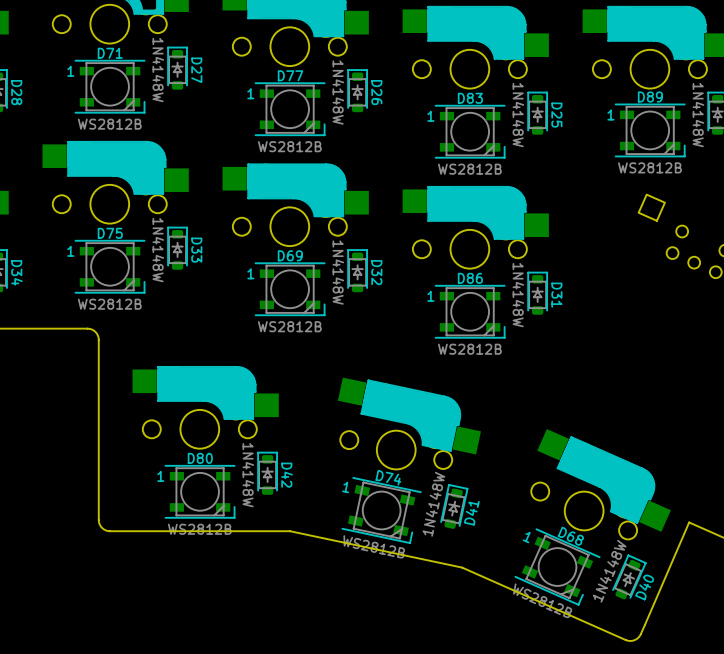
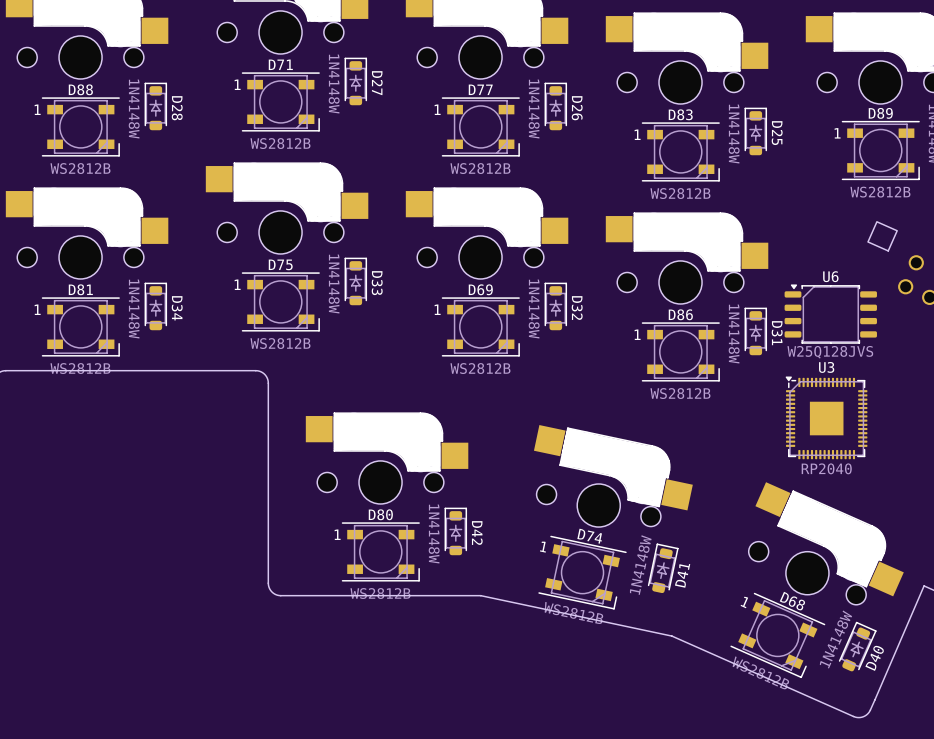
U6: none -> W25Q128JVS (830, 314)
U3: none -> RP2040 (826, 417)

